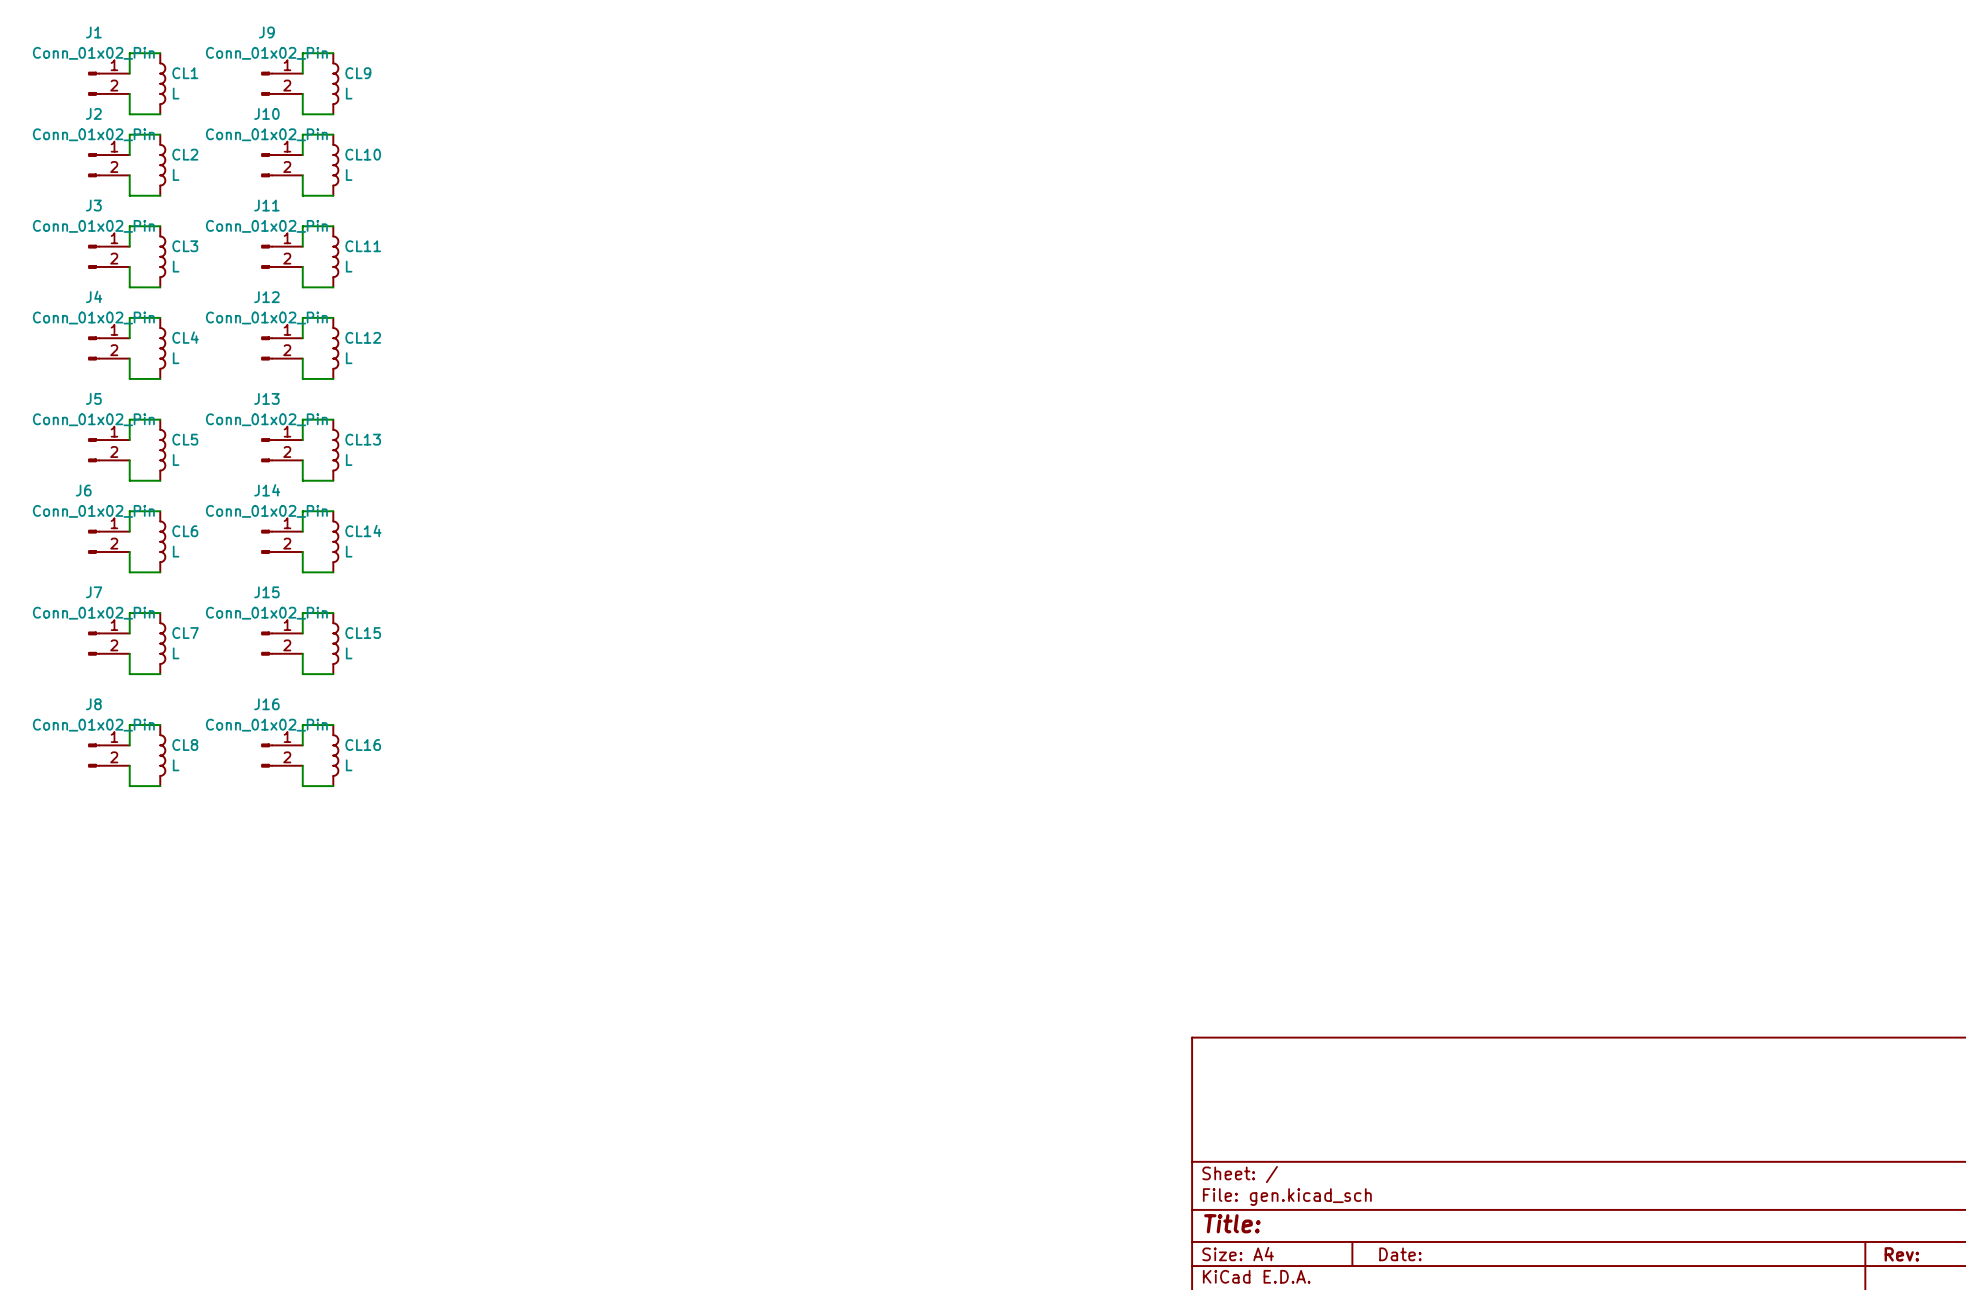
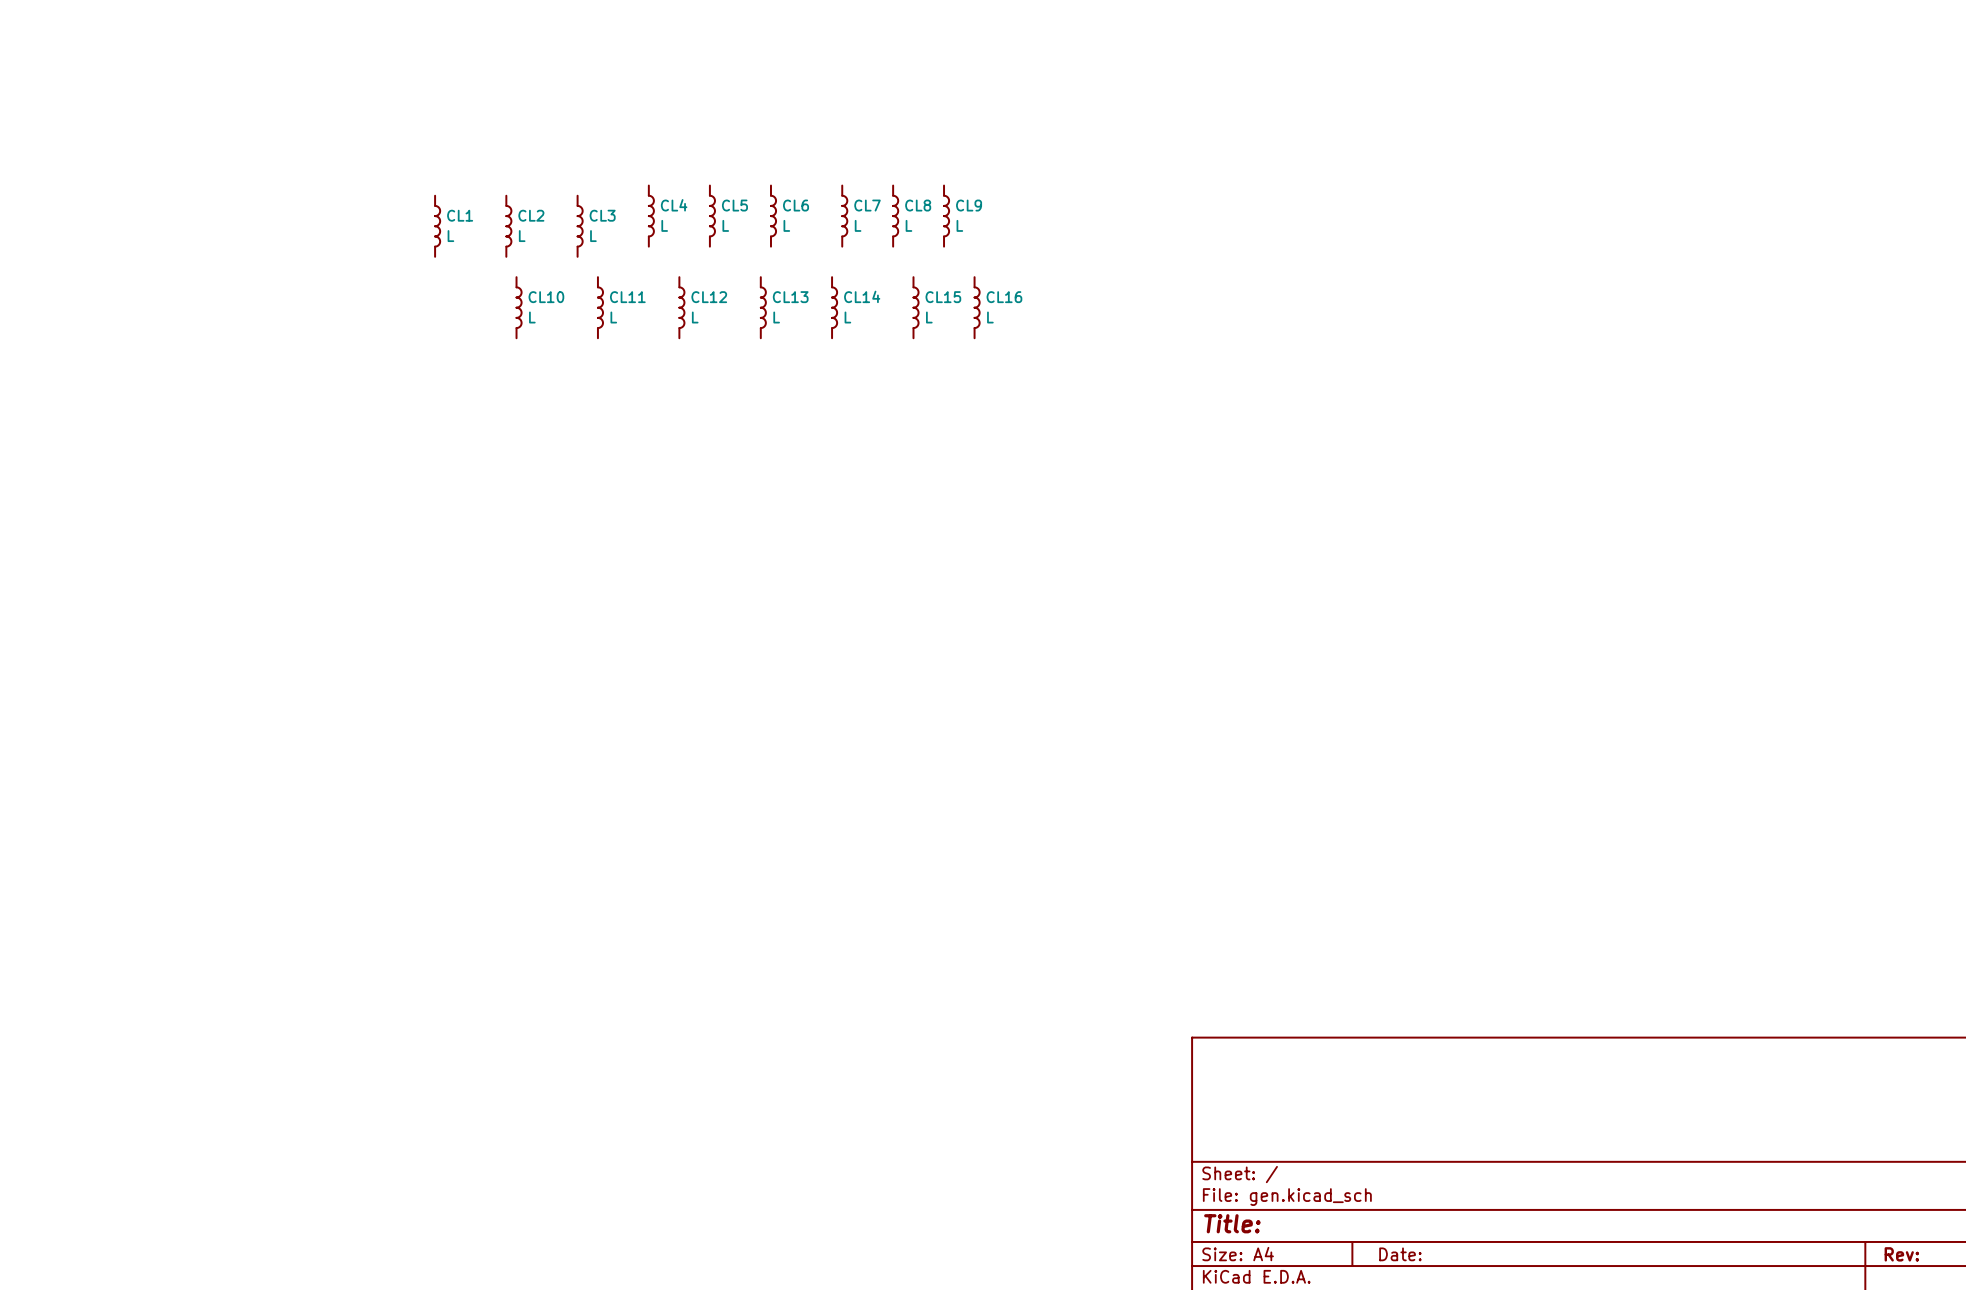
wire: (160, 53) (129, 53) (129, 73) -> none
wire: (333, 53) (302, 53) (302, 73) -> none
J1: Conn_01x02_Pin (109, 83) -> none
CL1 position: (162, 83) -> (437, 226)
J9: Conn_01x02_Pin (282, 83) -> none
CL9 position: (335, 83) -> (946, 216)
wire: (129, 93) (129, 114) (160, 114) -> none
wire: (302, 93) (302, 114) (333, 114) -> none
wire: (160, 134) (129, 134) (129, 155) -> none
wire: (333, 134) (302, 134) (302, 155) -> none
J2: Conn_01x02_Pin (109, 165) -> none
CL2 position: (162, 165) -> (508, 226)
J10: Conn_01x02_Pin (282, 165) -> none
CL10 position: (335, 165) -> (519, 307)
wire: (129, 175) (129, 195) (160, 195) -> none
wire: (302, 175) (302, 195) (333, 195) -> none
wire: (160, 226) (129, 226) (129, 246) -> none
wire: (333, 226) (302, 226) (302, 246) -> none
J3: Conn_01x02_Pin (109, 256) -> none
CL3 position: (162, 256) -> (580, 226)
J11: Conn_01x02_Pin (282, 256) -> none
CL11 position: (335, 256) -> (600, 307)
wire: (129, 266) (129, 287) (160, 287) -> none
wire: (302, 266) (302, 287) (333, 287) -> none
wire: (160, 317) (129, 317) (129, 338) -> none
wire: (333, 317) (302, 317) (302, 338) -> none
J4: Conn_01x02_Pin (109, 348) -> none
CL4 position: (162, 348) -> (651, 216)
J12: Conn_01x02_Pin (282, 348) -> none
CL12 position: (335, 348) -> (681, 307)
wire: (129, 358) (129, 378) (160, 378) -> none
wire: (302, 358) (302, 378) (333, 378) -> none
wire: (160, 419) (129, 419) (129, 440) -> none
wire: (333, 419) (302, 419) (302, 440) -> none
J5: Conn_01x02_Pin (109, 450) -> none
CL5 position: (162, 450) -> (712, 216)
J13: Conn_01x02_Pin (282, 450) -> none
CL13 position: (335, 450) -> (763, 307)
wire: (129, 460) (129, 480) (160, 480) -> none
wire: (302, 460) (302, 480) (333, 480) -> none
wire: (160, 511) (129, 511) (129, 531) -> none
wire: (333, 511) (302, 511) (302, 531) -> none
J6: Conn_01x02_Pin (109, 541) -> none
CL6 position: (162, 541) -> (773, 216)
J14: Conn_01x02_Pin (282, 541) -> none
CL14 position: (335, 541) -> (834, 307)
wire: (129, 551) (129, 572) (160, 572) -> none
wire: (302, 551) (302, 572) (333, 572) -> none
wire: (160, 613) (129, 613) (129, 633) -> none
wire: (333, 613) (302, 613) (302, 633) -> none
J7: Conn_01x02_Pin (109, 643) -> none
CL7 position: (162, 643) -> (844, 216)
J15: Conn_01x02_Pin (282, 643) -> none
CL15 position: (335, 643) -> (916, 307)
wire: (129, 653) (129, 674) (160, 674) -> none
wire: (302, 653) (302, 674) (333, 674) -> none
wire: (160, 725) (129, 725) (129, 745) -> none
wire: (333, 725) (302, 725) (302, 745) -> none
J8: Conn_01x02_Pin (109, 755) -> none
CL8 position: (162, 755) -> (895, 216)
J16: Conn_01x02_Pin (282, 755) -> none
CL16 position: (335, 755) -> (977, 307)
wire: (129, 765) (129, 786) (160, 786) -> none
wire: (302, 765) (302, 786) (333, 786) -> none

